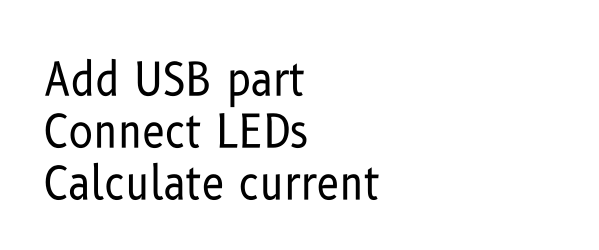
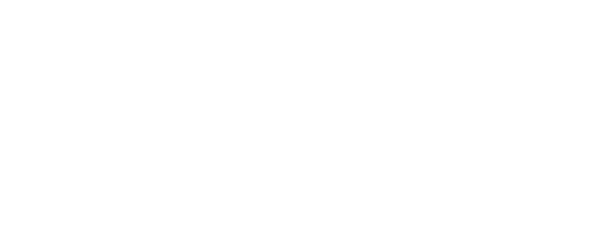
text: Add USB part (174, 82) -> none
text: Connect LEDs (176, 130) -> none
text: Calculate current (212, 181) -> none

